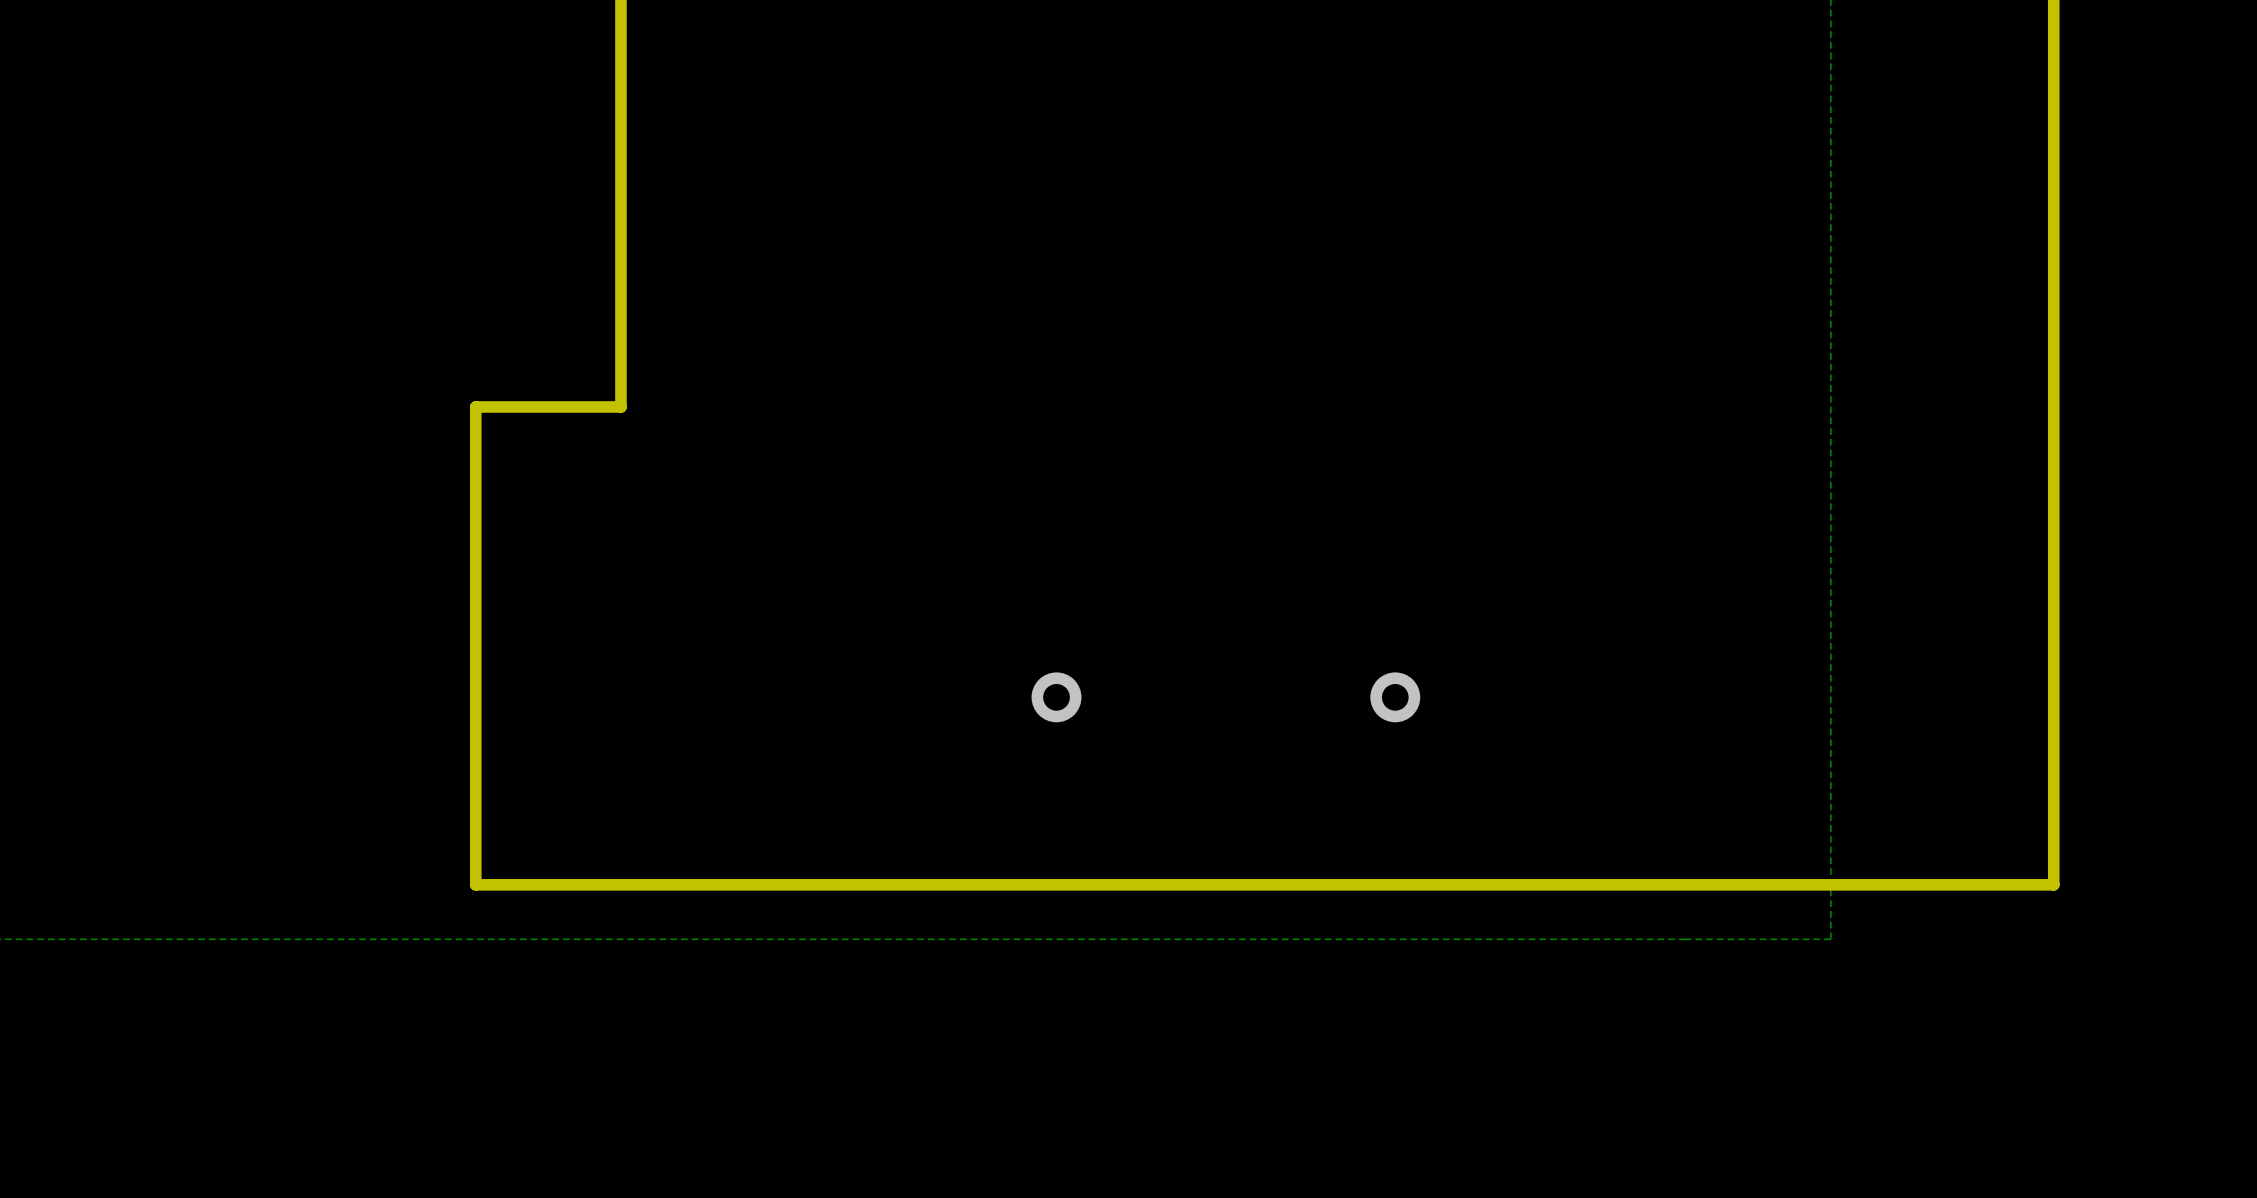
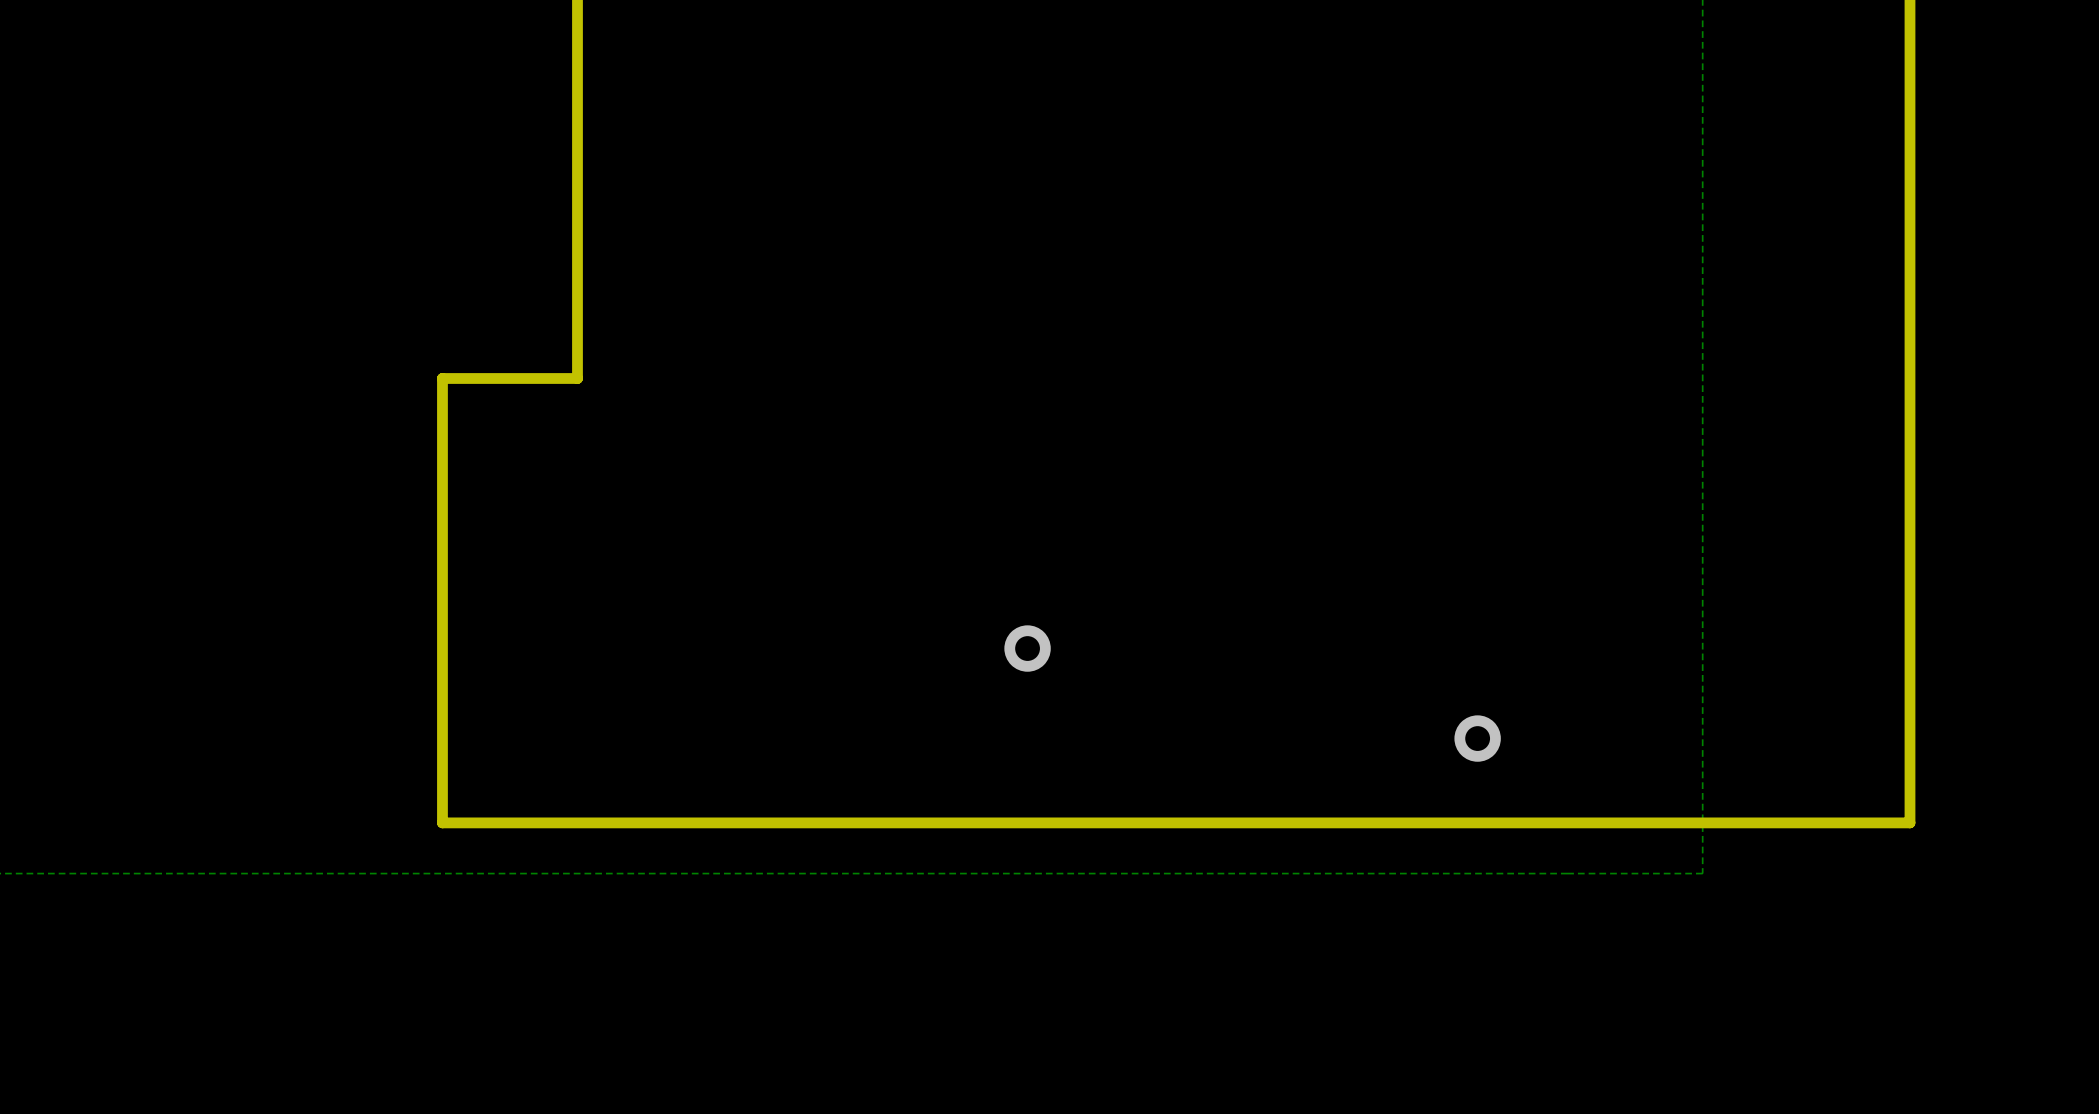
via position: (1056, 697) -> (1027, 648)
via: (1395, 697) -> none
via: none -> (1477, 738)

